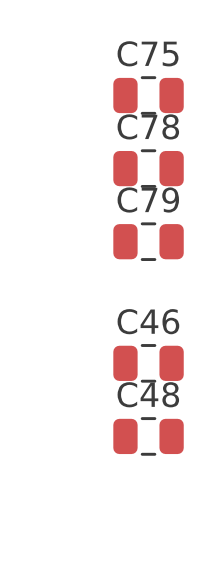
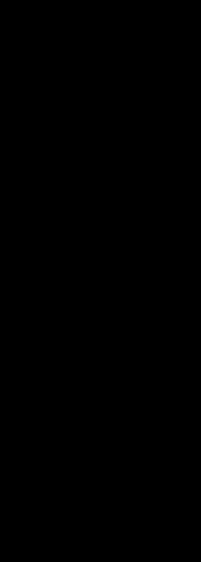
C75: (148, 95) -> none
C78: (148, 168) -> none
C79: (148, 241) -> none
C46: (148, 363) -> none
C48: (148, 436) -> none

